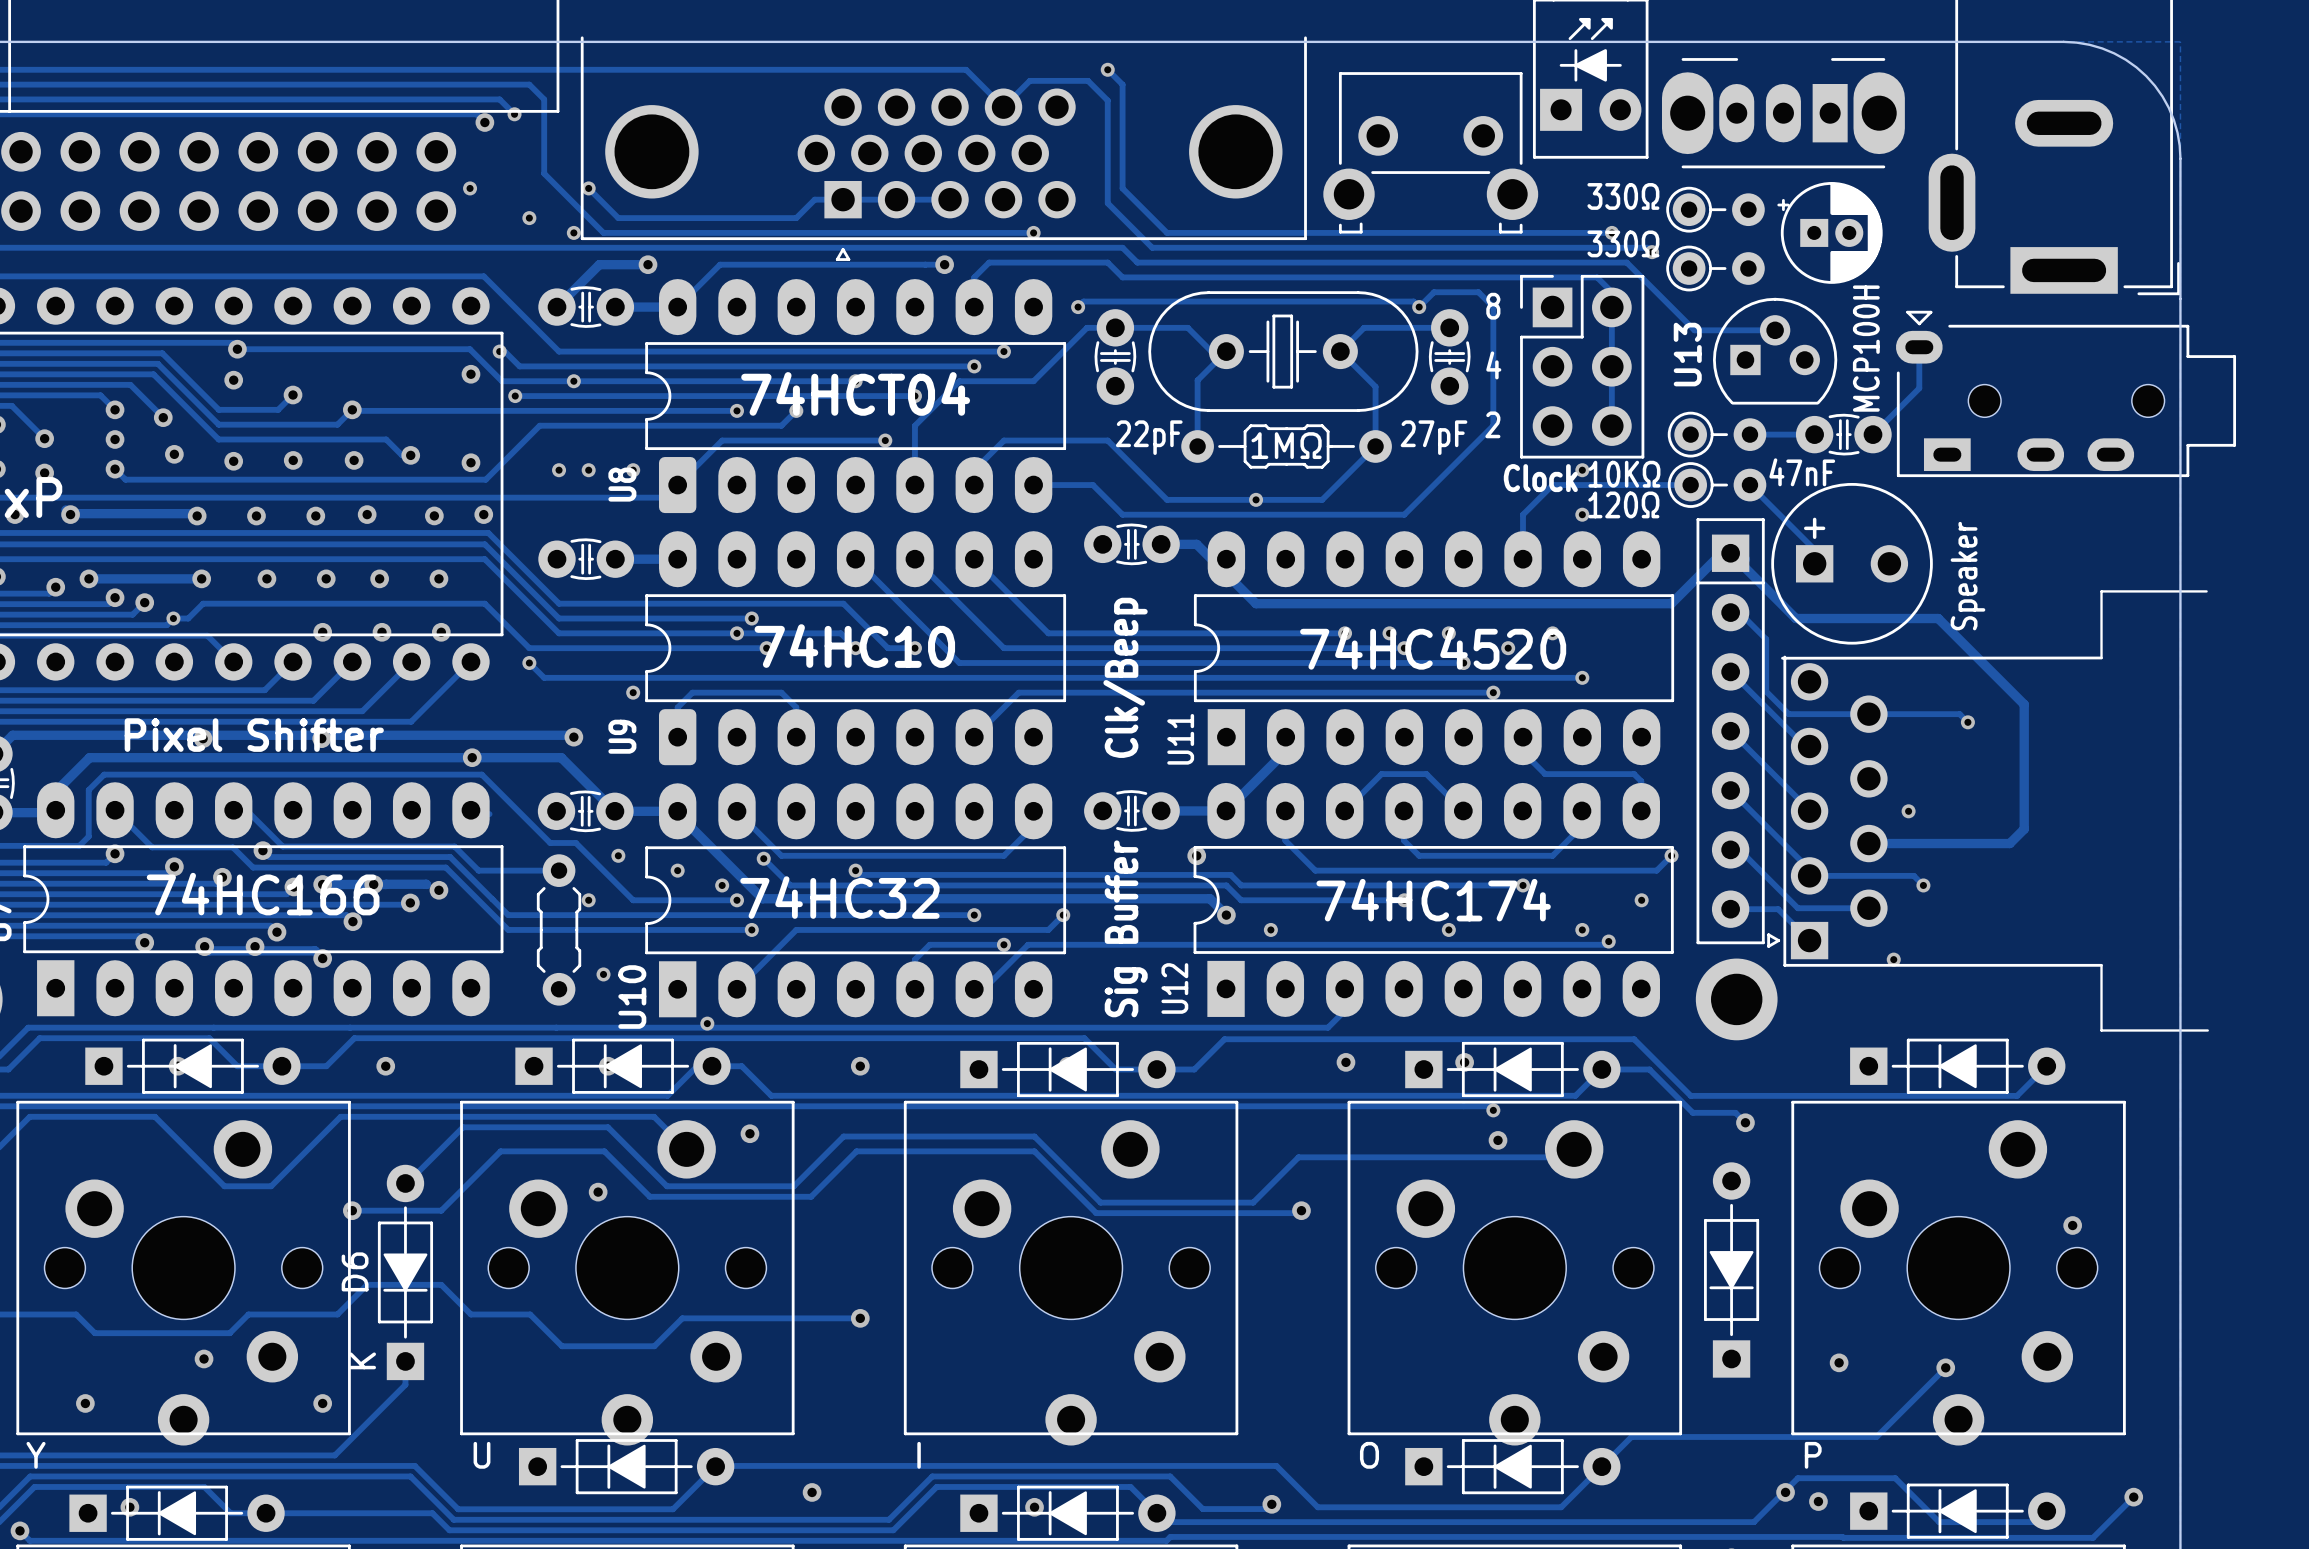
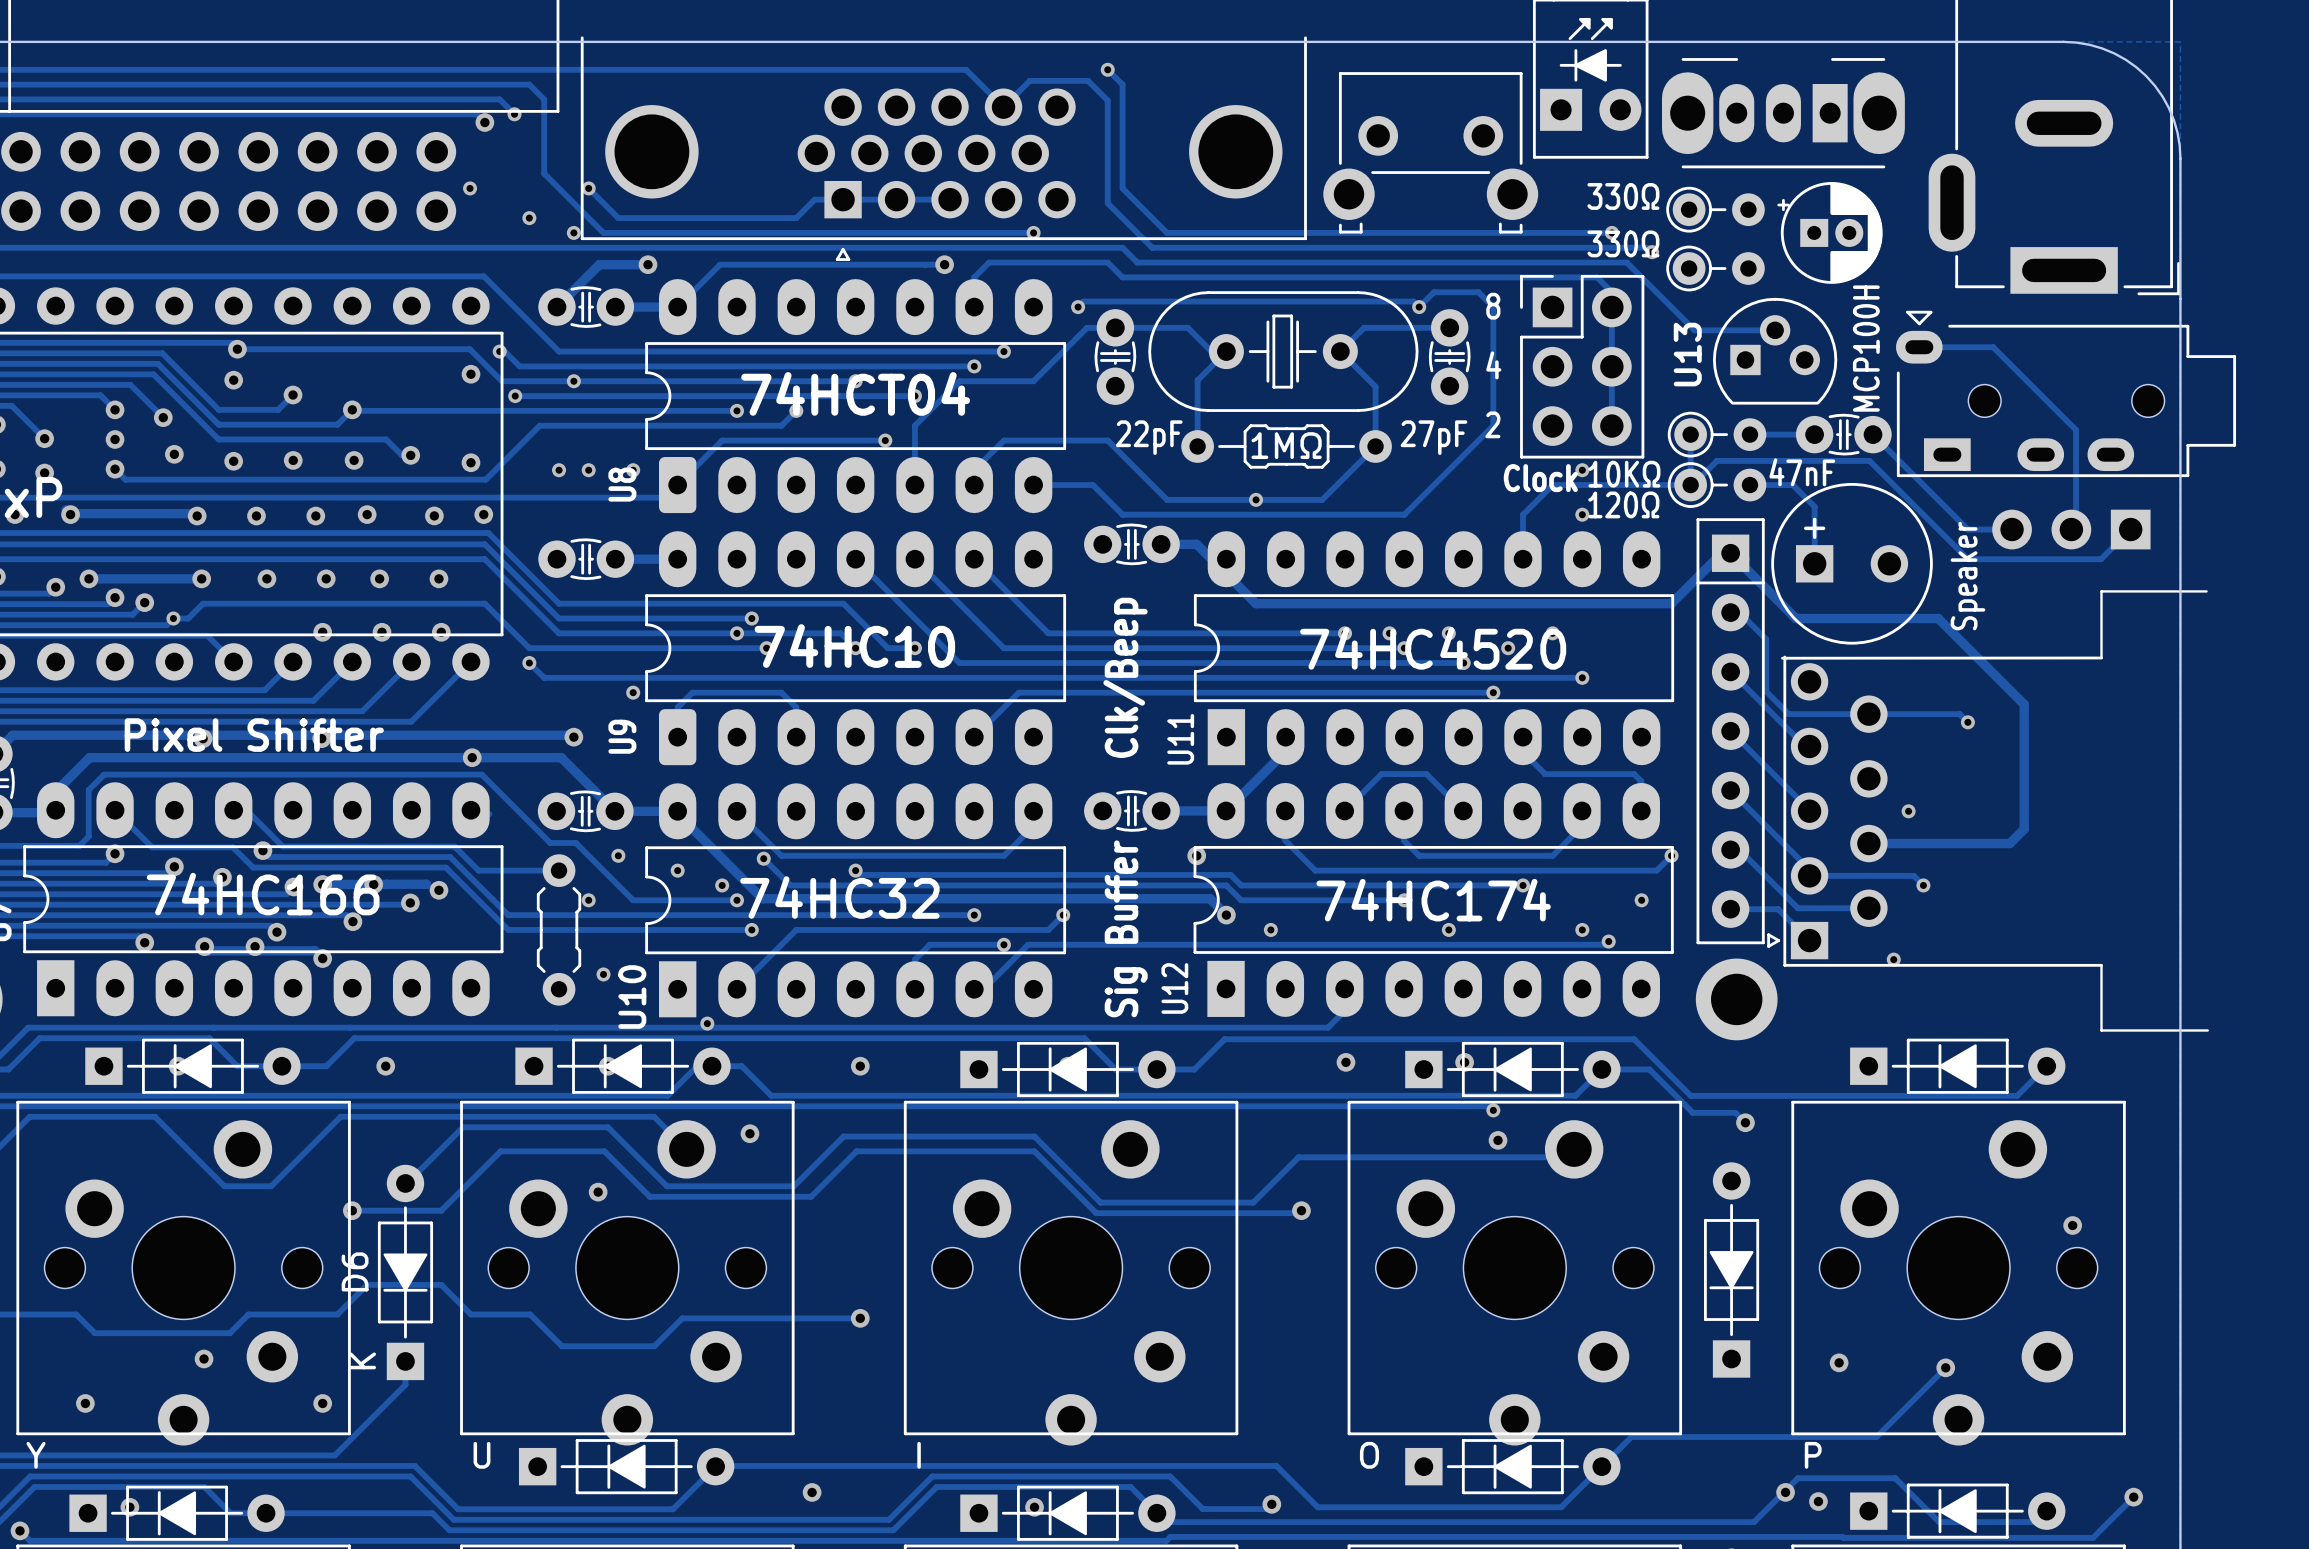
track: (1919, 347) (1919, 388) (1873, 434) -> (2012, 529) (1967, 529) (1873, 434)
track: none -> (1919, 347) (1993, 347) (2076, 430) (2076, 524) (2071, 529)
track: none -> (1690, 434) (1690, 485) (1716, 460) (1869, 460) (1967, 559) (2101, 559) (2130, 529)
track: (1749, 485) (1824, 559) (1824, 574) -> (1749, 485) (1792, 485) (1814, 506) (1814, 563)
part: none -> (2071, 529)

